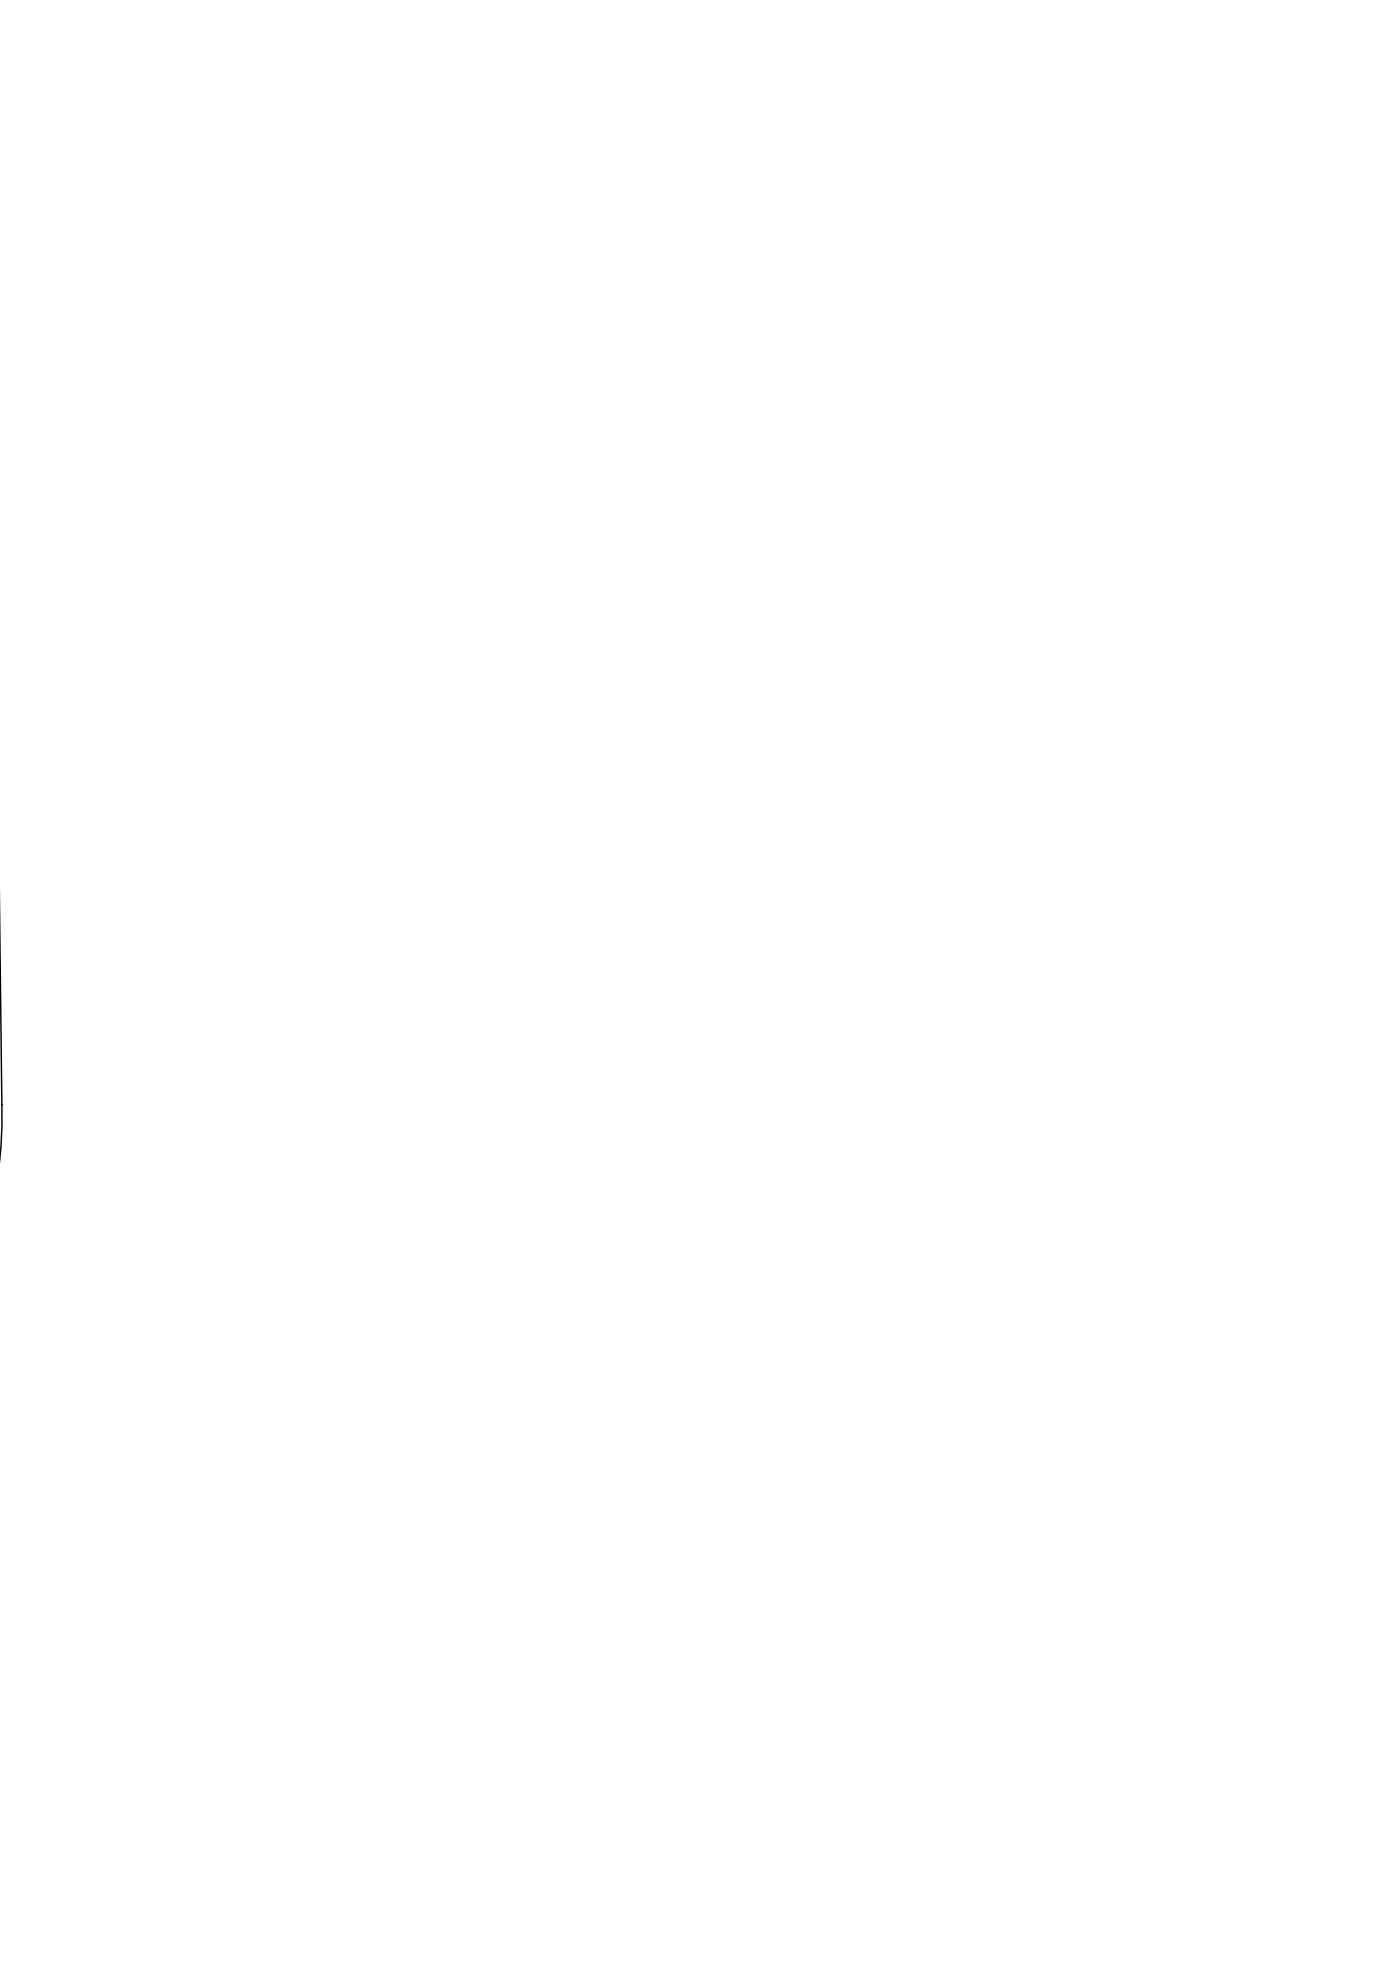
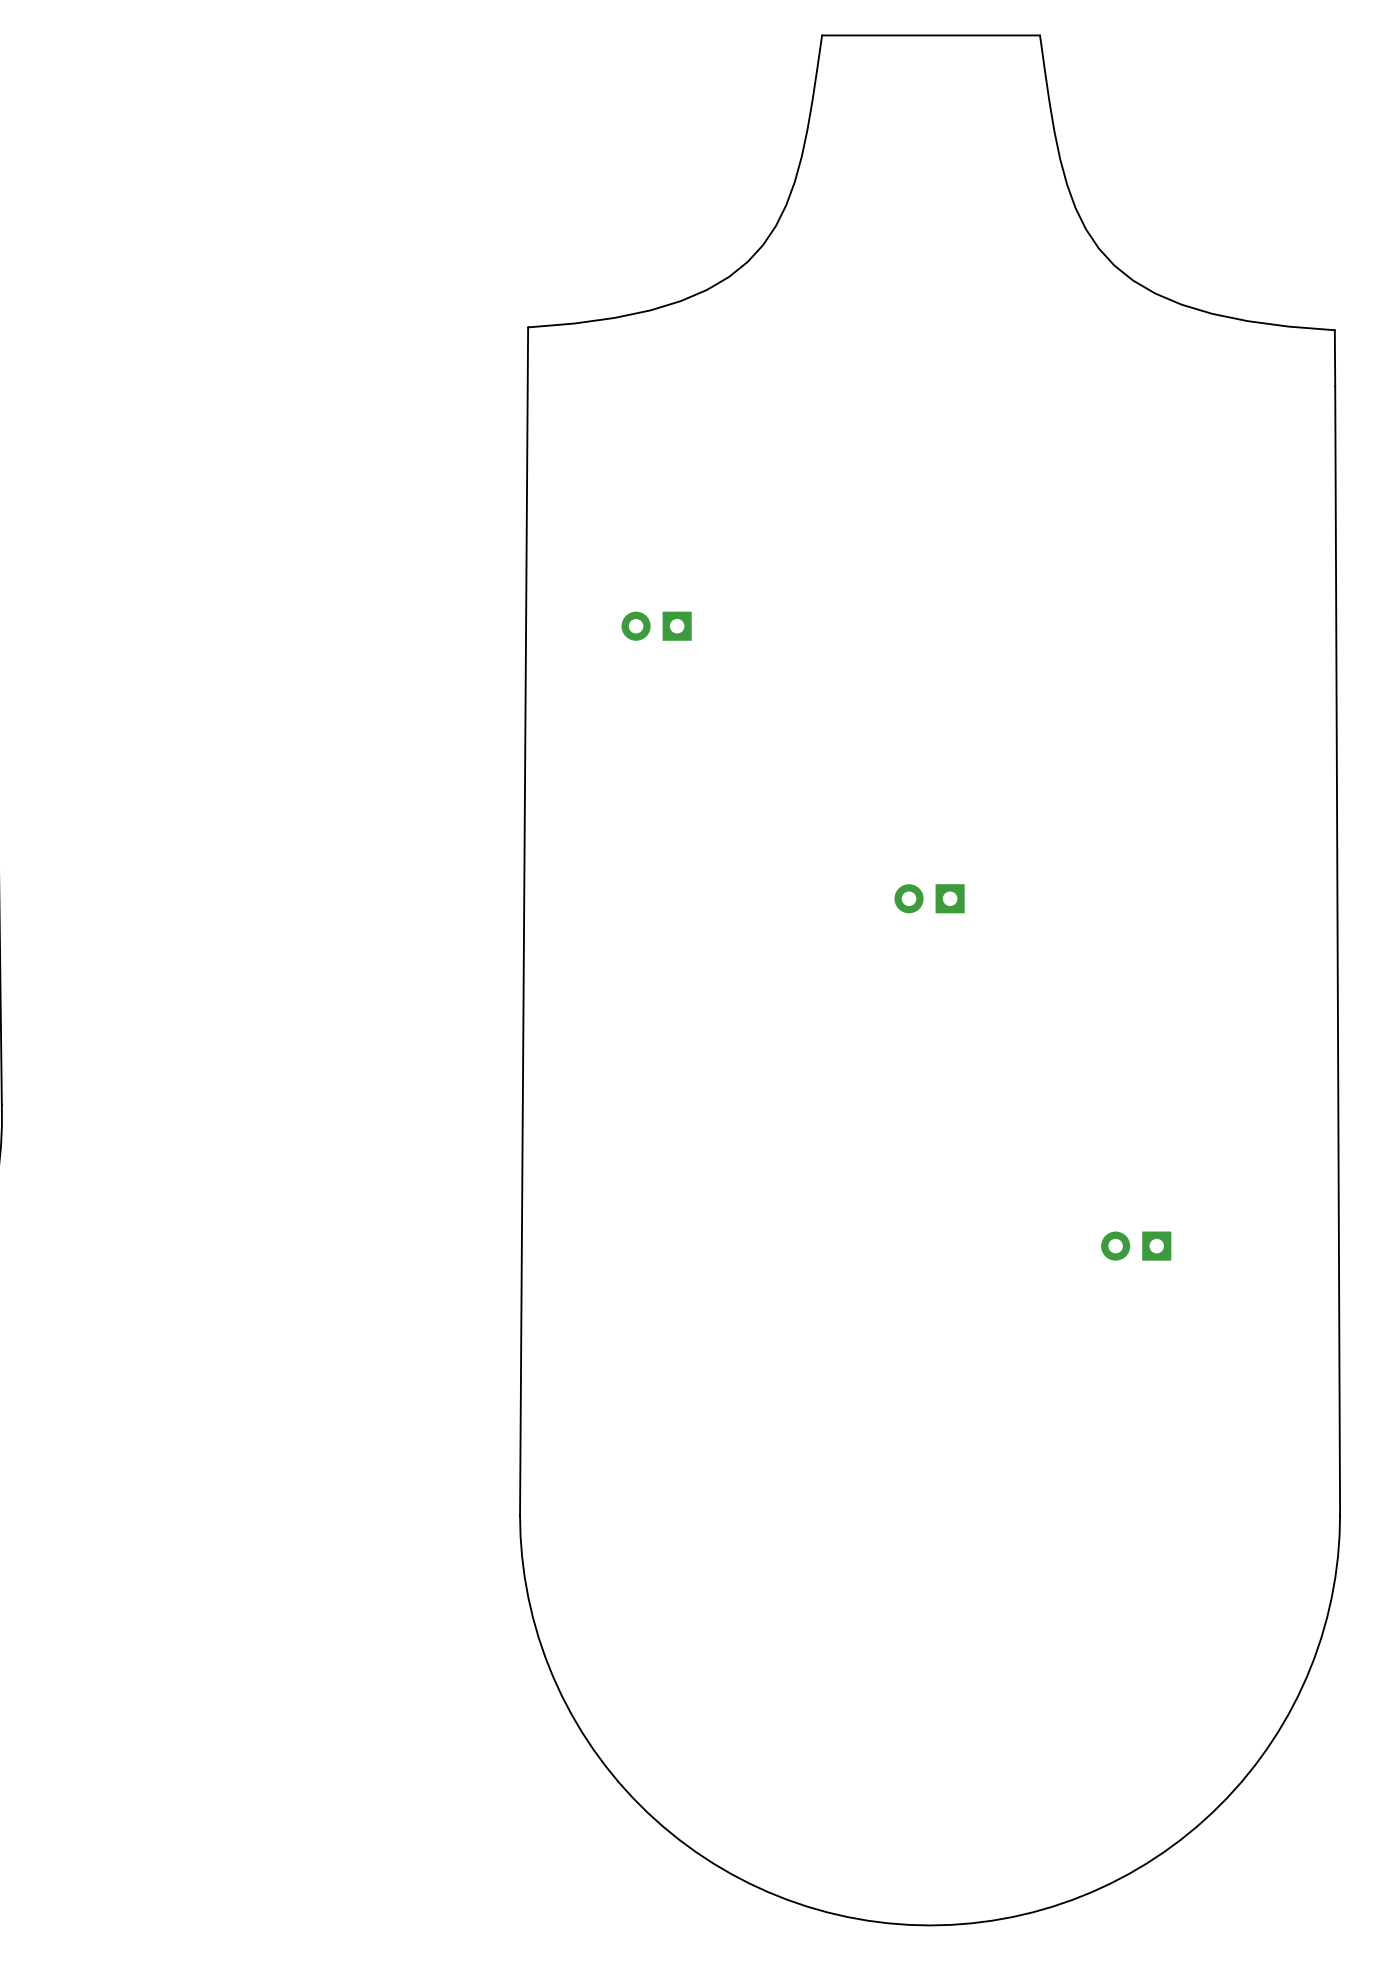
board edge: none -> (1040, 35) (822, 35) (807, 129) (794, 182) (775, 226) (763, 244) (747, 261) (729, 276) (706, 289) (680, 301) (650, 310) (574, 323) (528, 327) (520, 1515) (522, 1556) (533, 1618) (553, 1677) (582, 1732) (618, 1782) (662, 1826) (713, 1863) (768, 1892) (827, 1912) (867, 1920) (909, 1924) (971, 1923) (1012, 1917) (1052, 1906) (1091, 1892) (1129, 1873) (1164, 1851) (1197, 1826) (1227, 1797) (1254, 1766) (1278, 1732) (1298, 1695) (1314, 1657) (1327, 1618) (1335, 1577) (1339, 1536) (1334, 330) (1288, 326) (1212, 313) (1181, 304) (1155, 293) (1132, 280) (1114, 265) (1098, 248) (1085, 229) (1067, 184) (1054, 131) (1040, 35)
part: none -> (656, 626)
part: none -> (929, 898)
part: none -> (1136, 1246)

